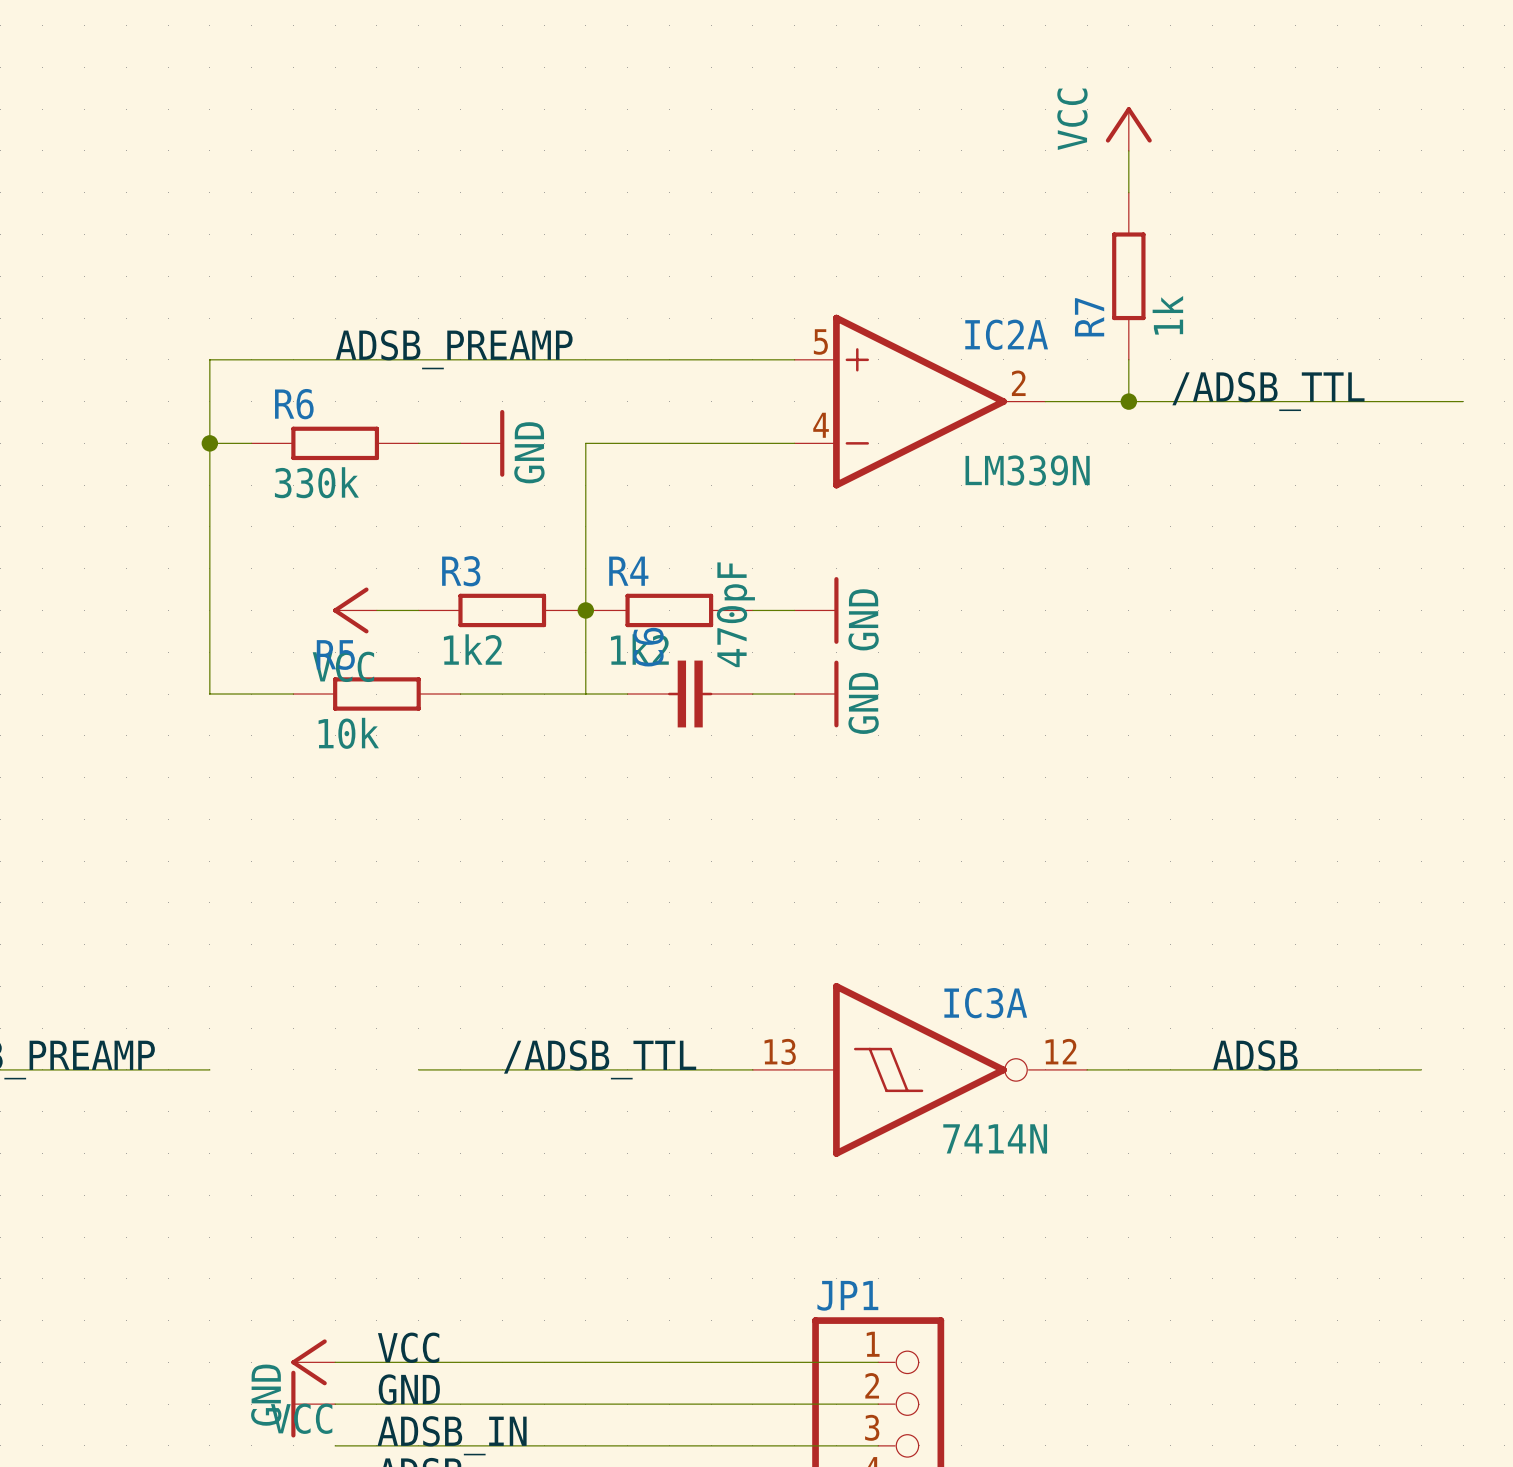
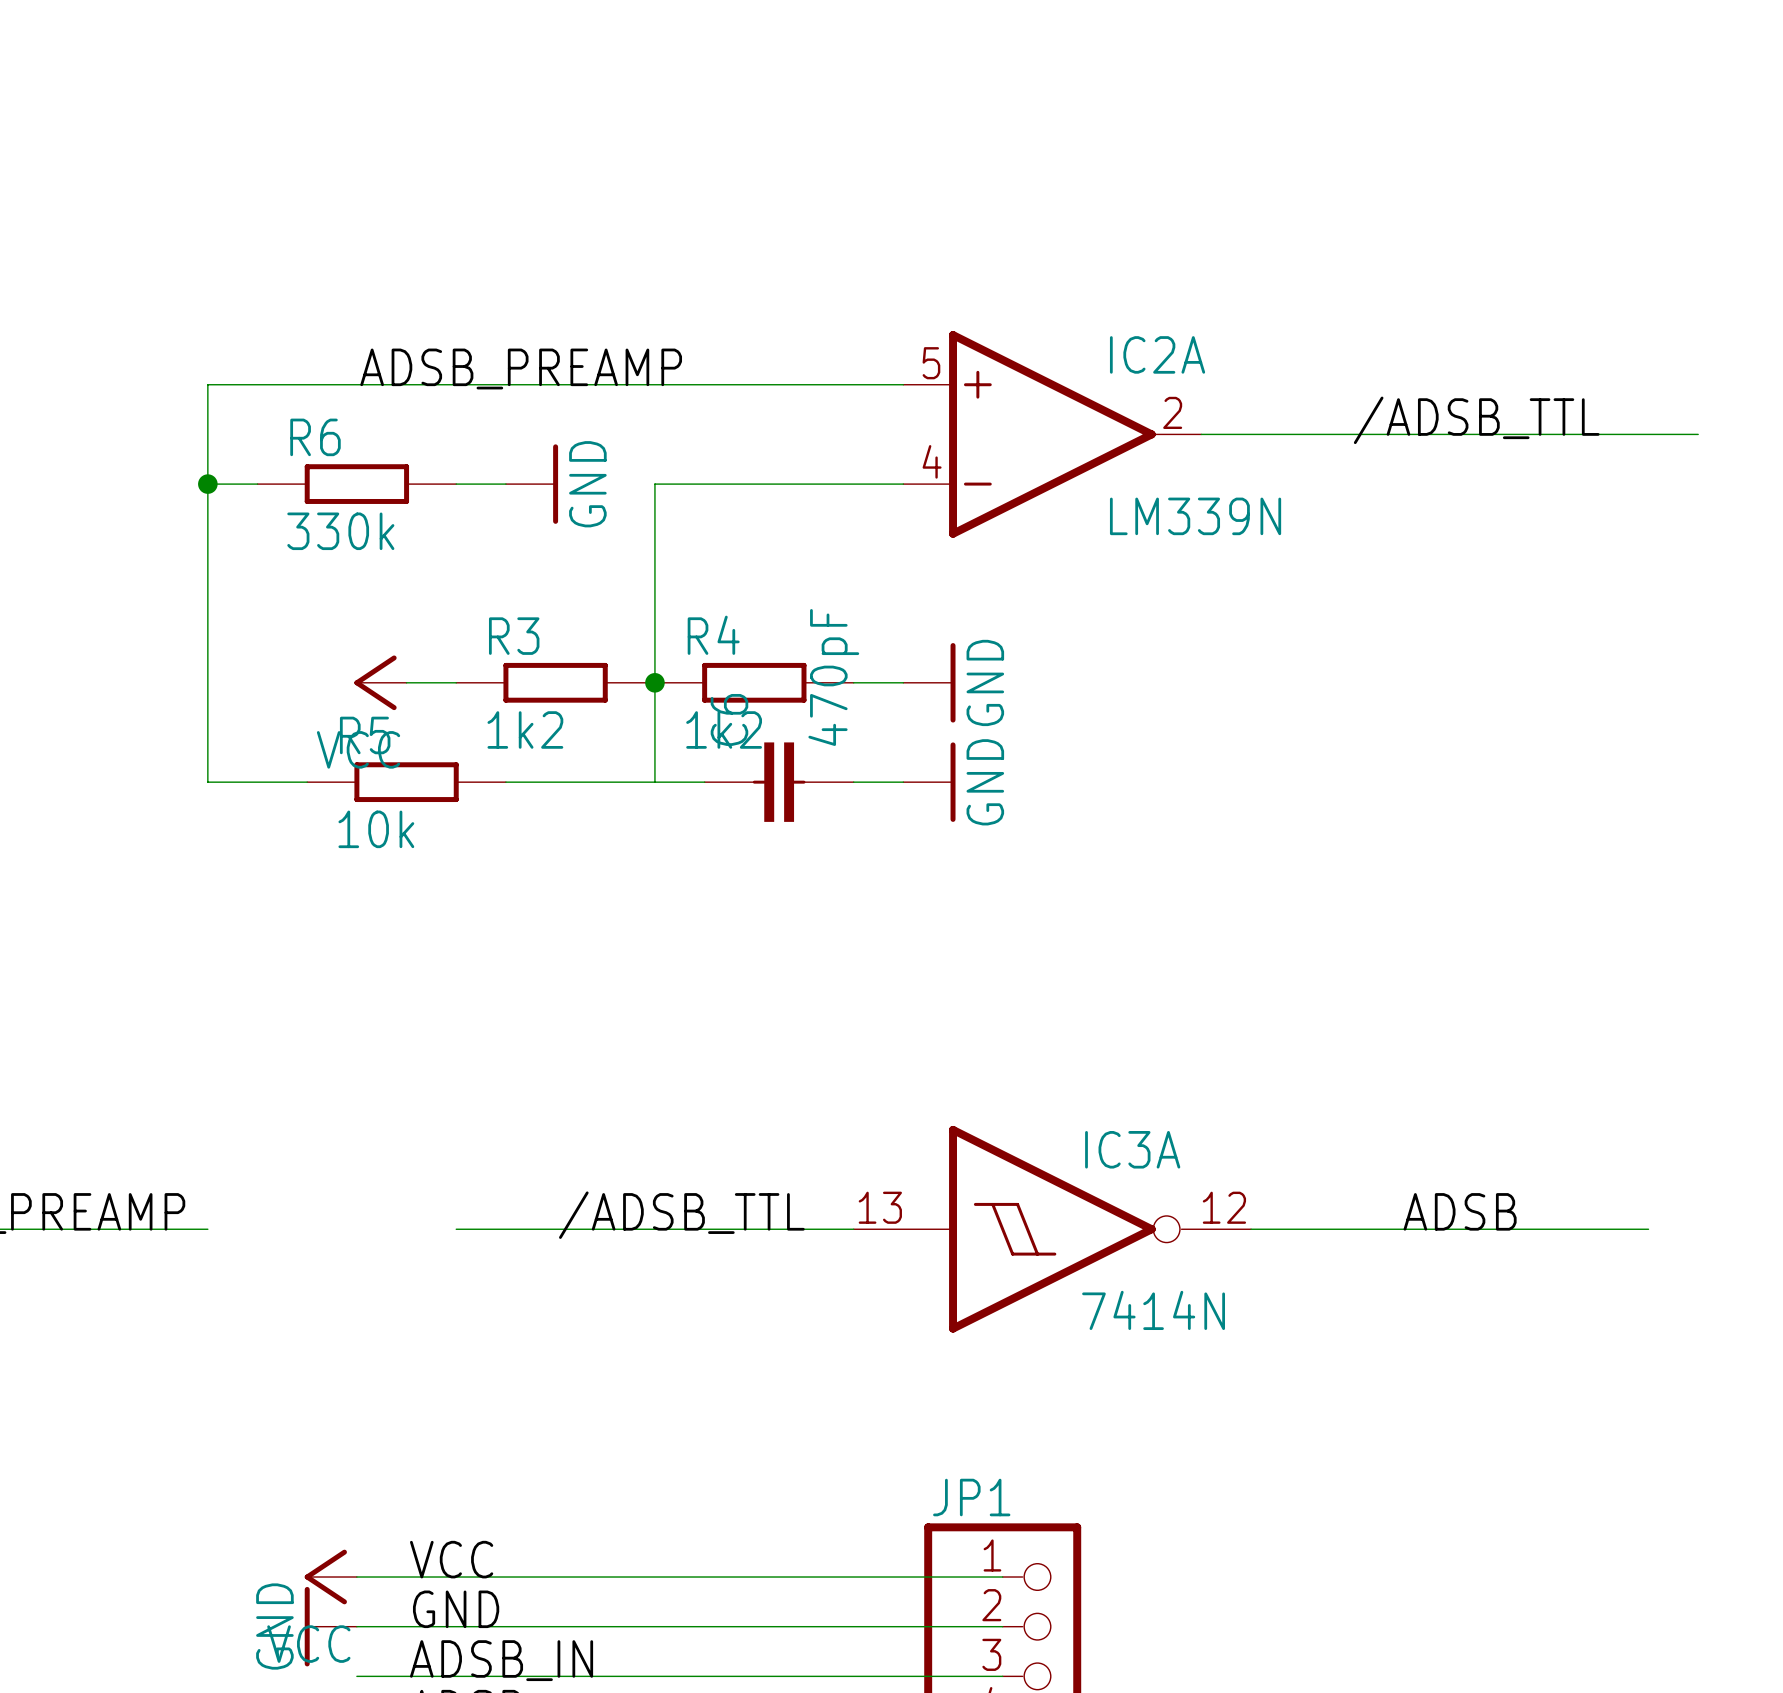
power symbol: VCC (1128, 129) -> none
wire: (1128, 150) (1128, 192) -> none
R7: 1k (1128, 276) -> none
wire: (1128, 359) (1128, 401) -> none
junction: (1128, 401) -> none

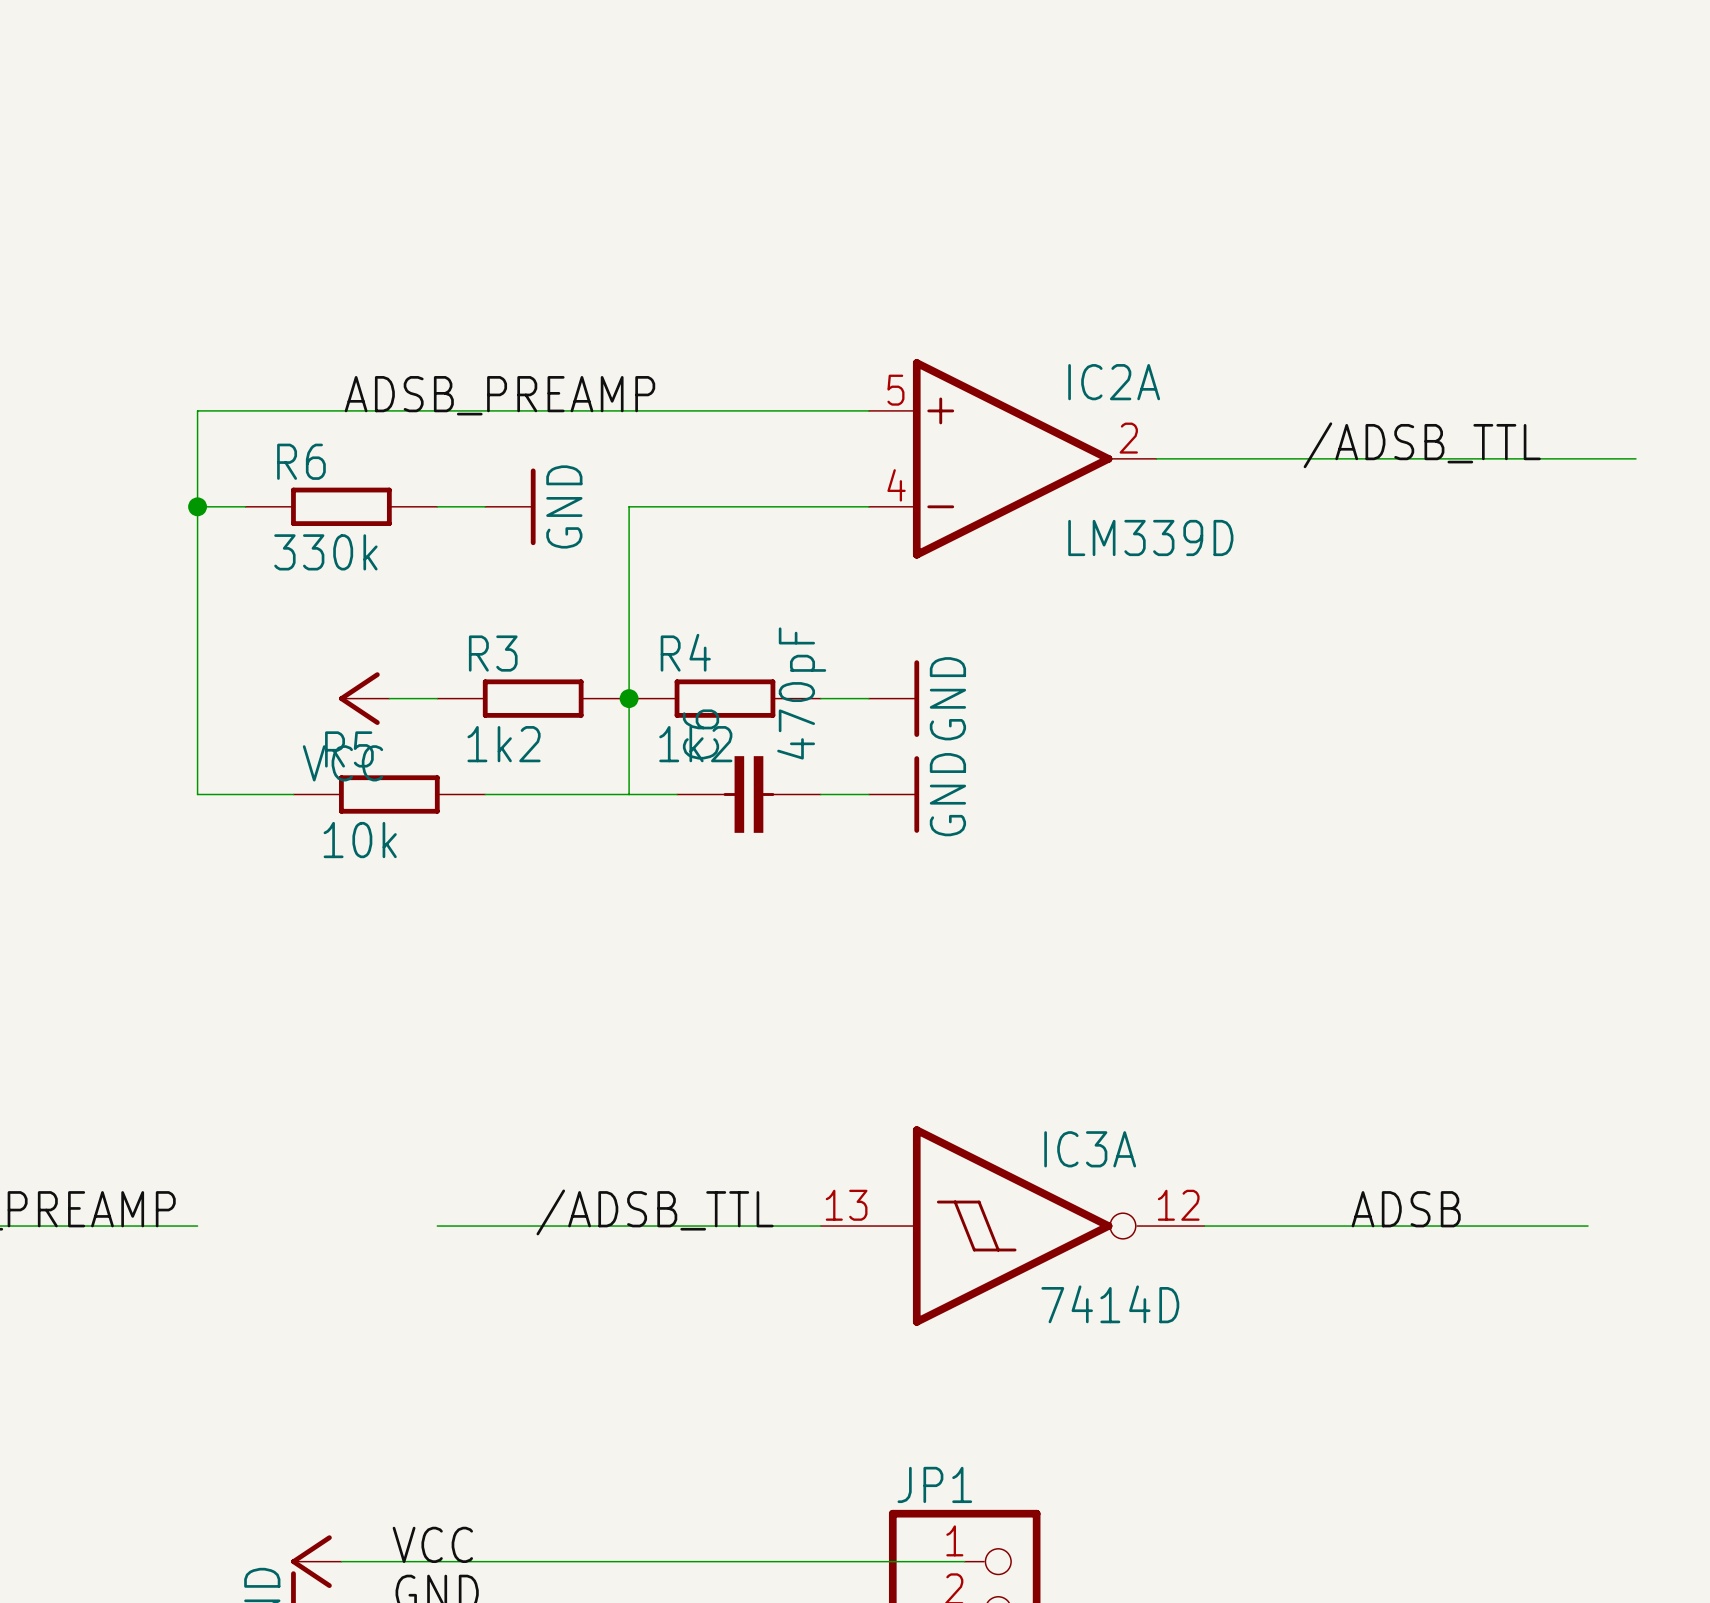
IC2A value: LM339N (1195, 516) -> LM339D (1150, 537)
IC3A value: 7414N (1153, 1310) -> 7414D (1110, 1304)

